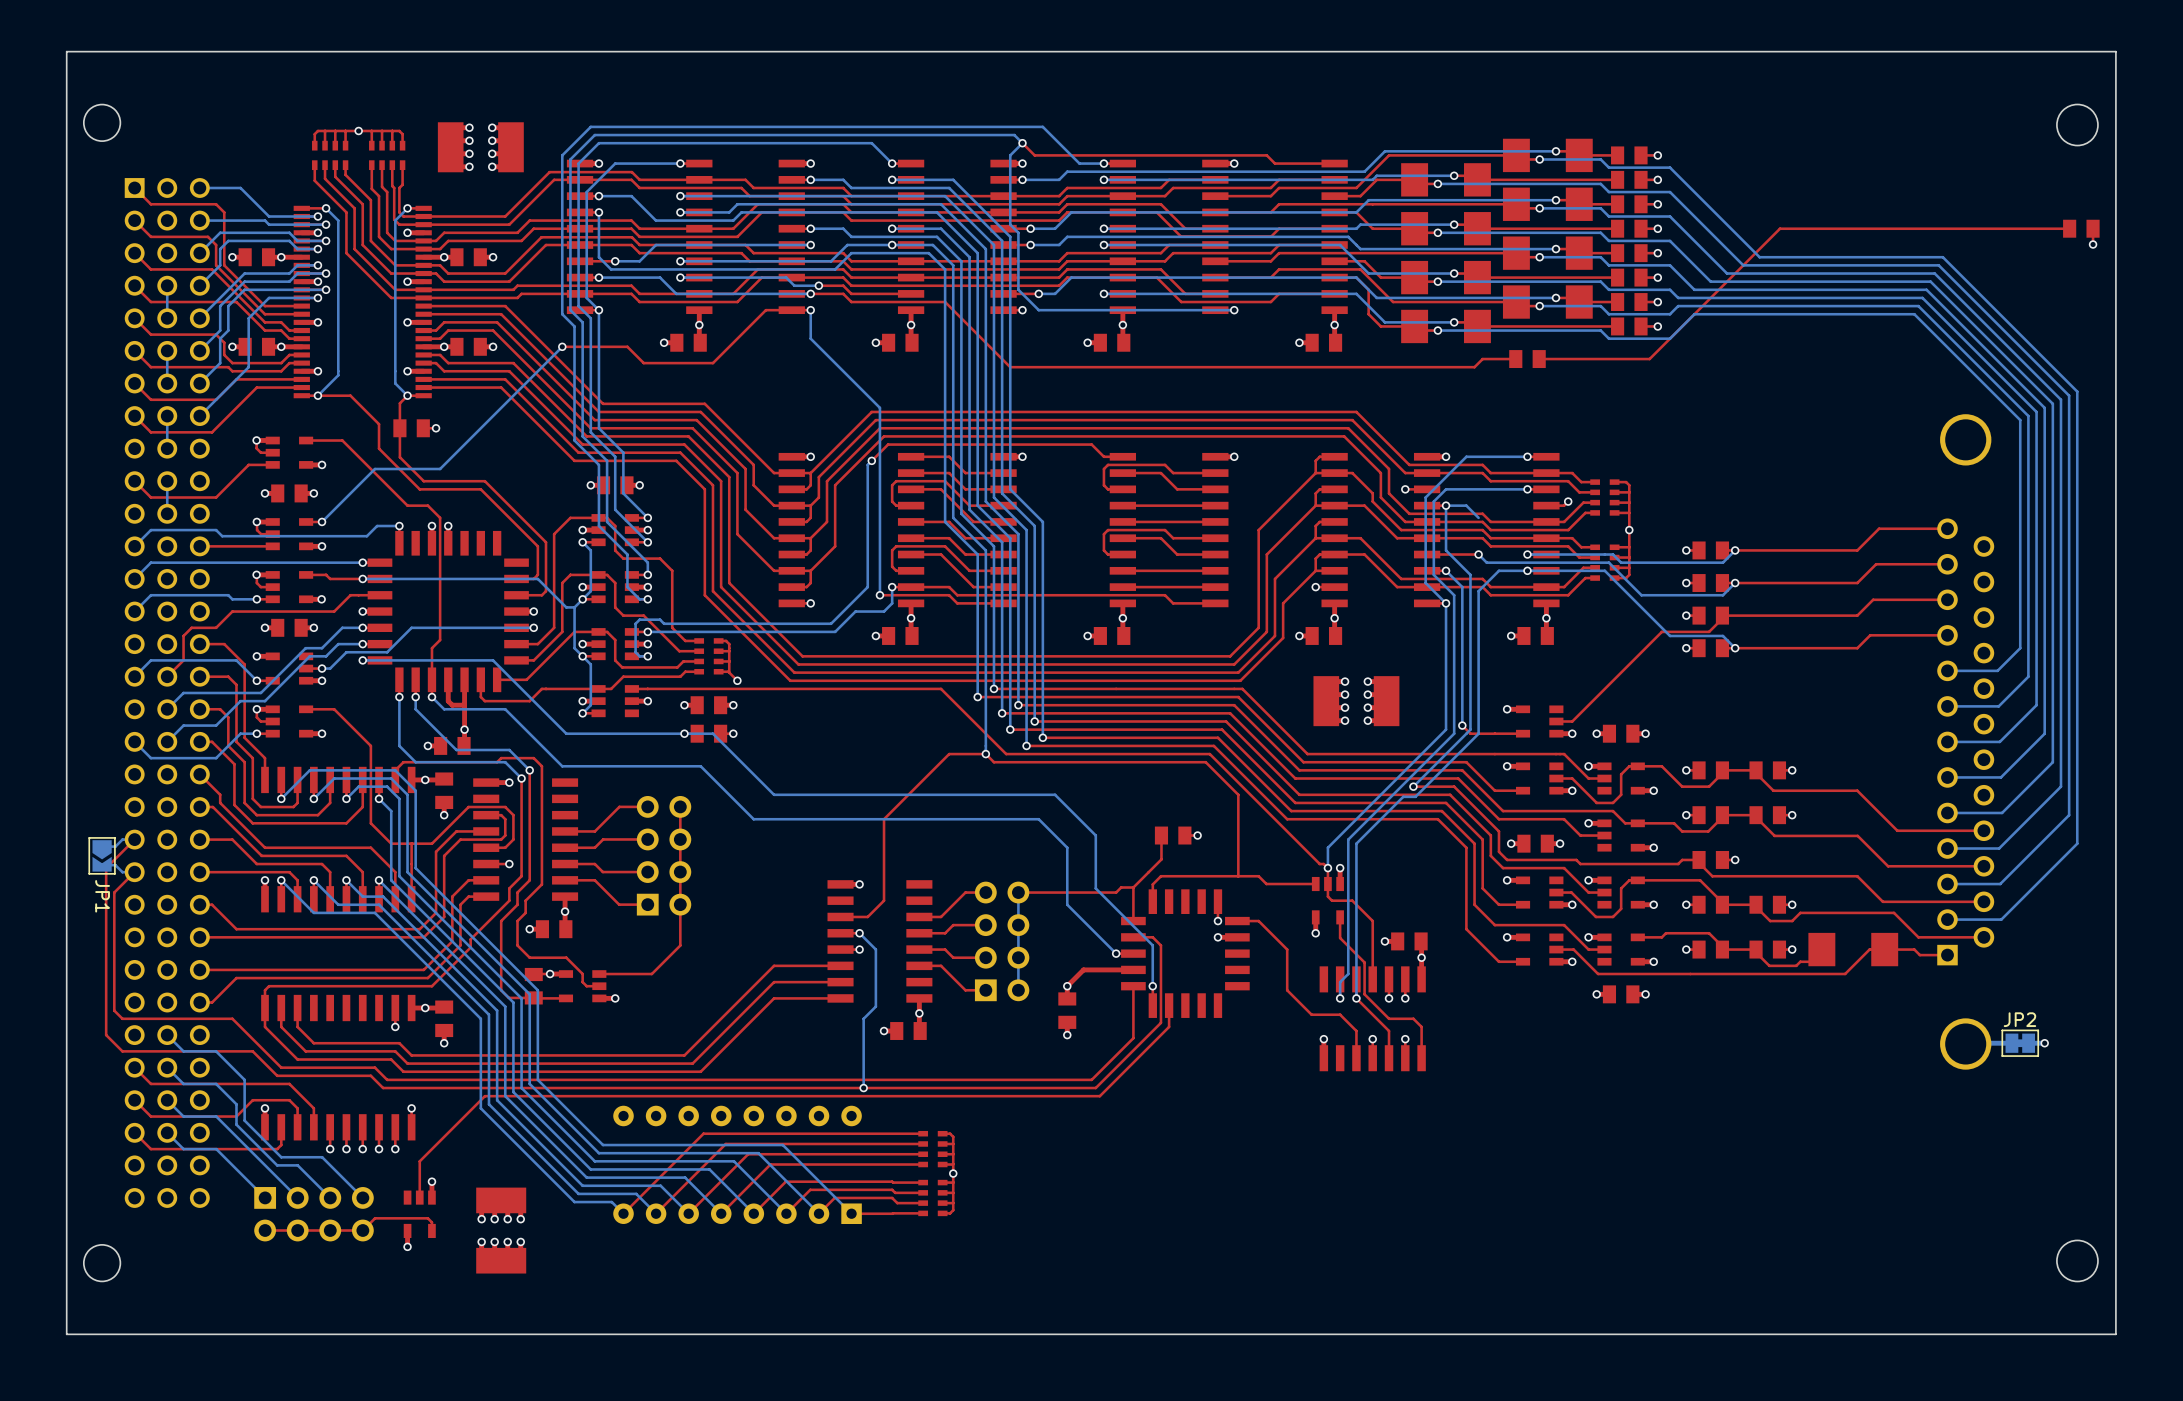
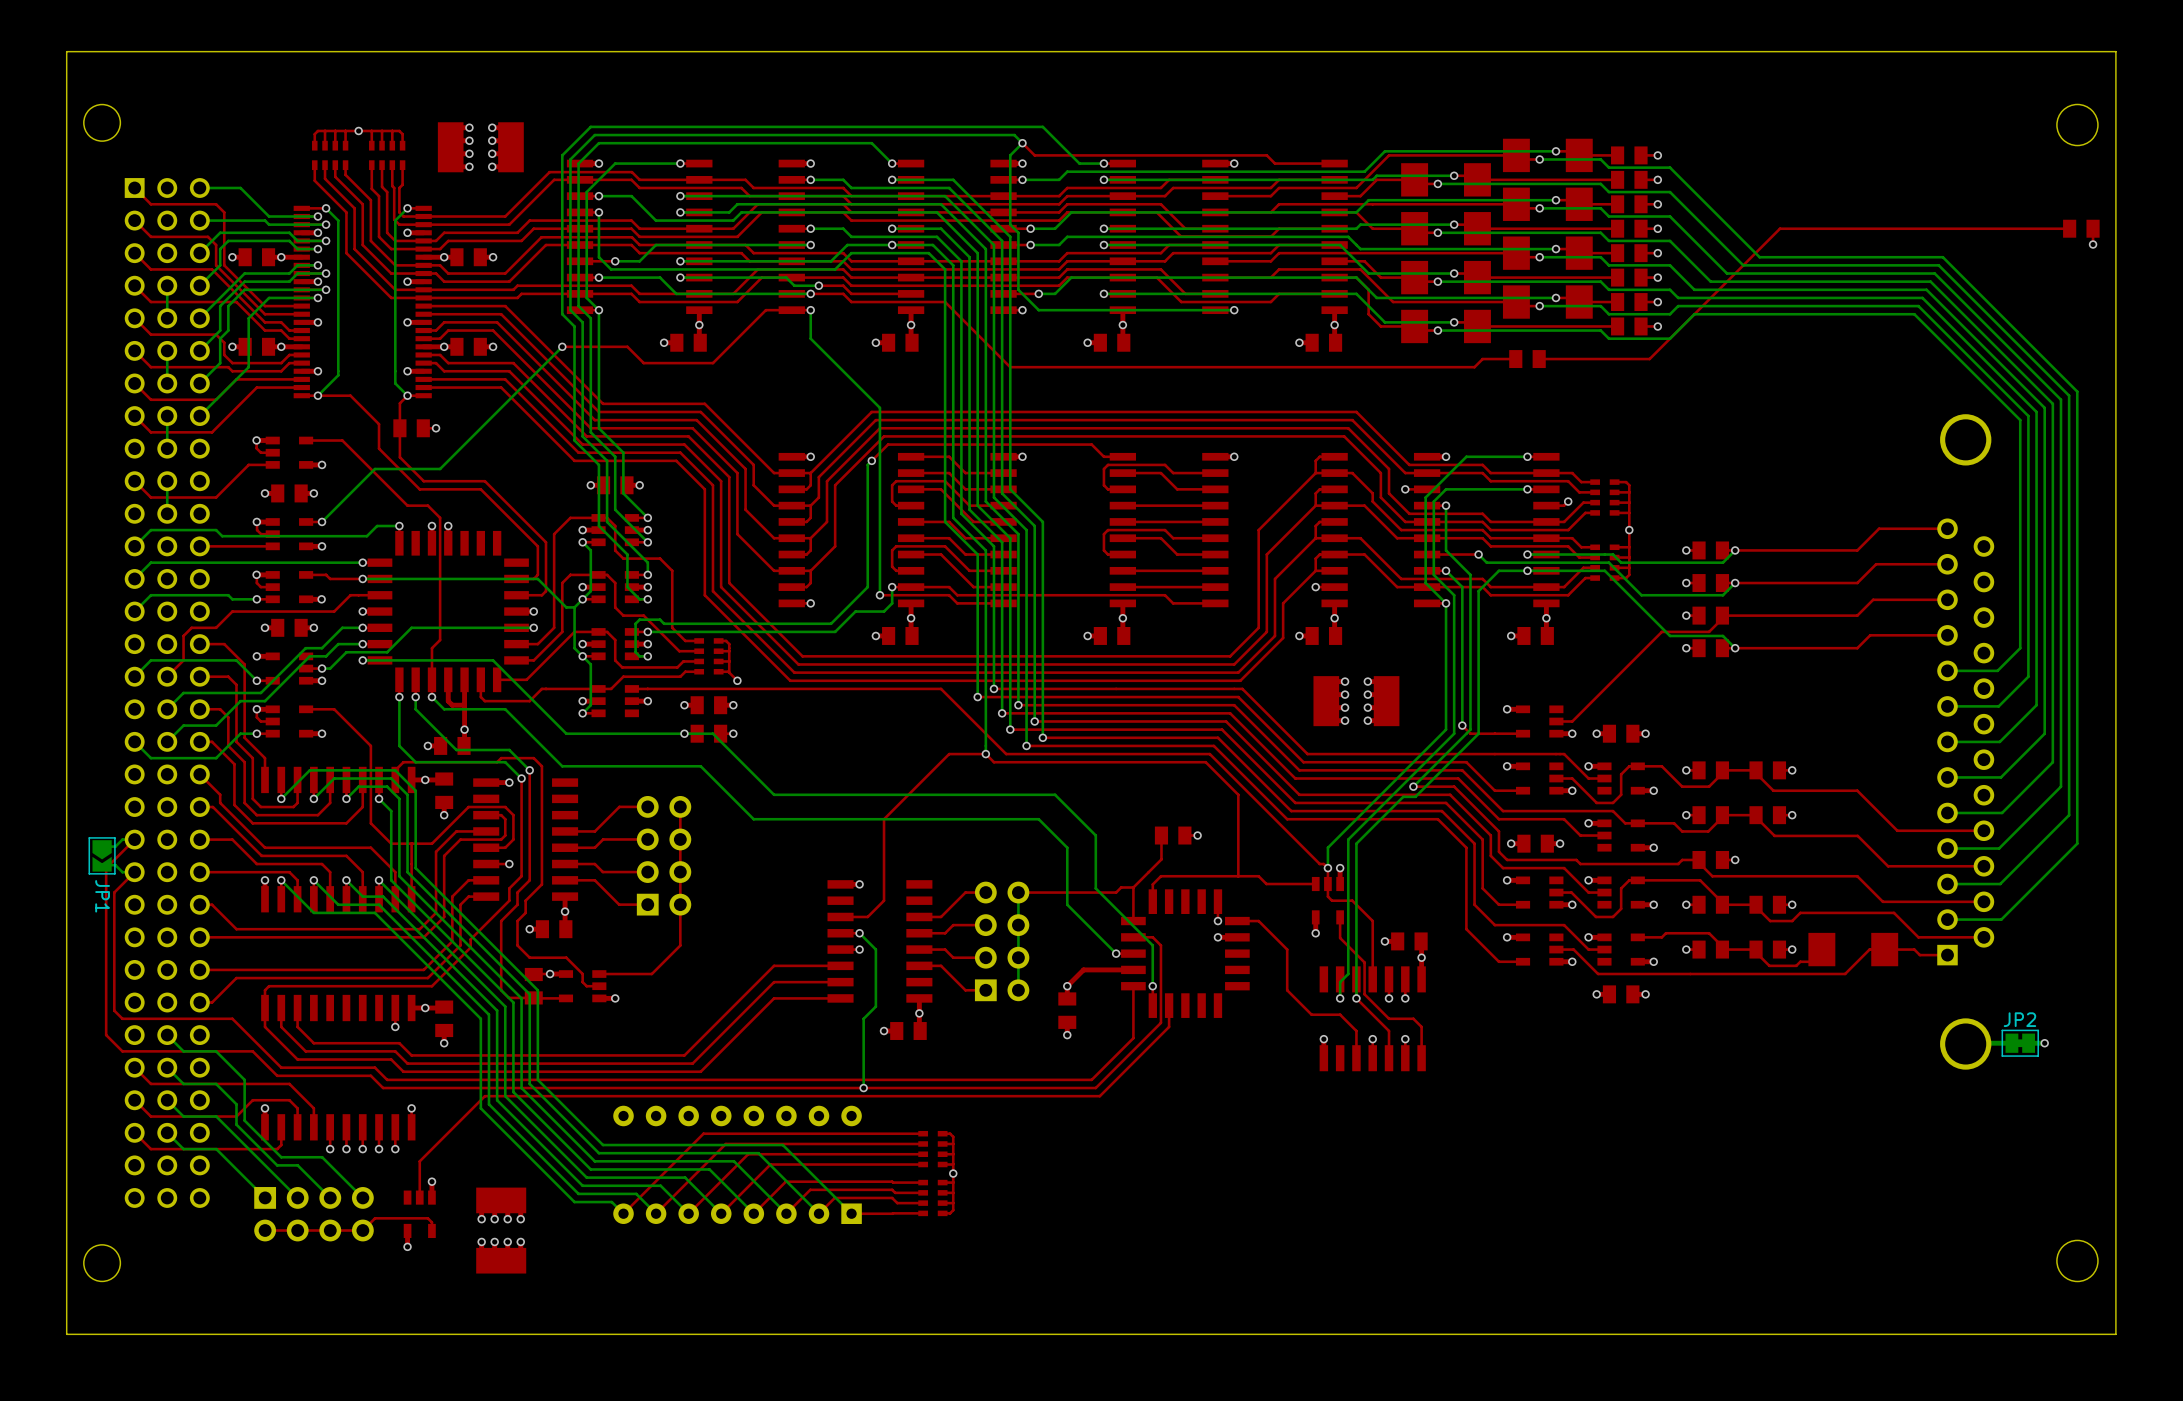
bottom track: (1446, 505) (1466, 505) (1478, 517) -> none

